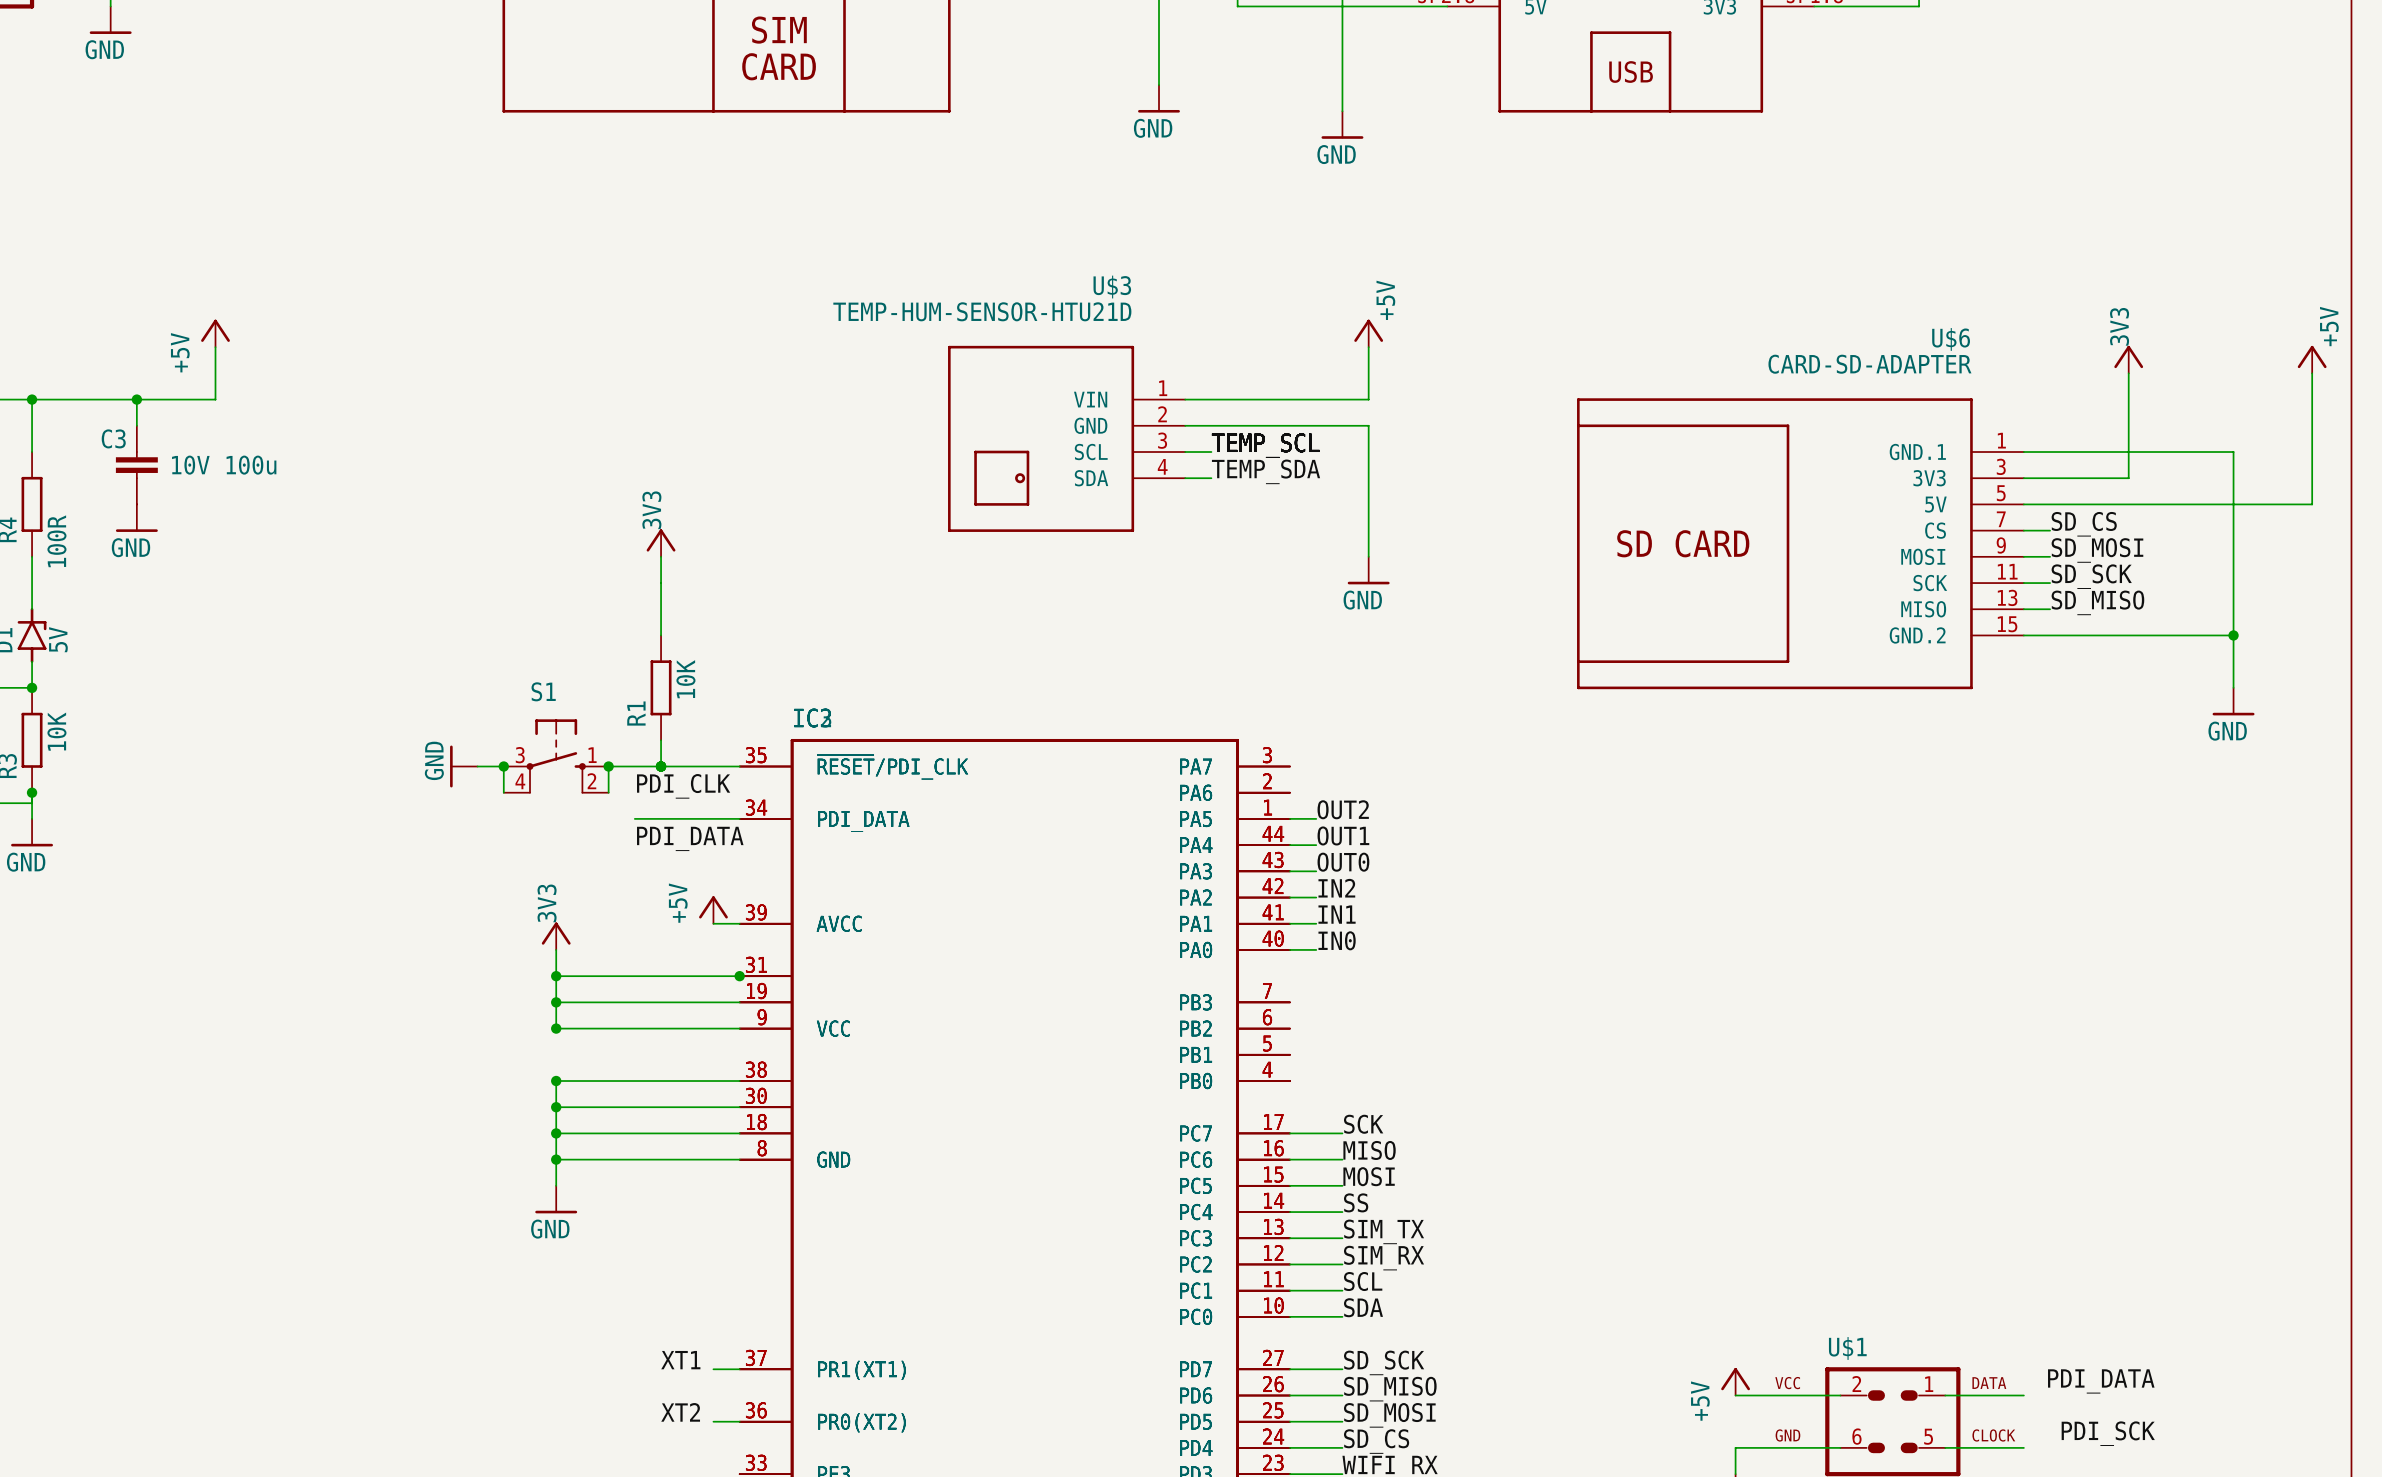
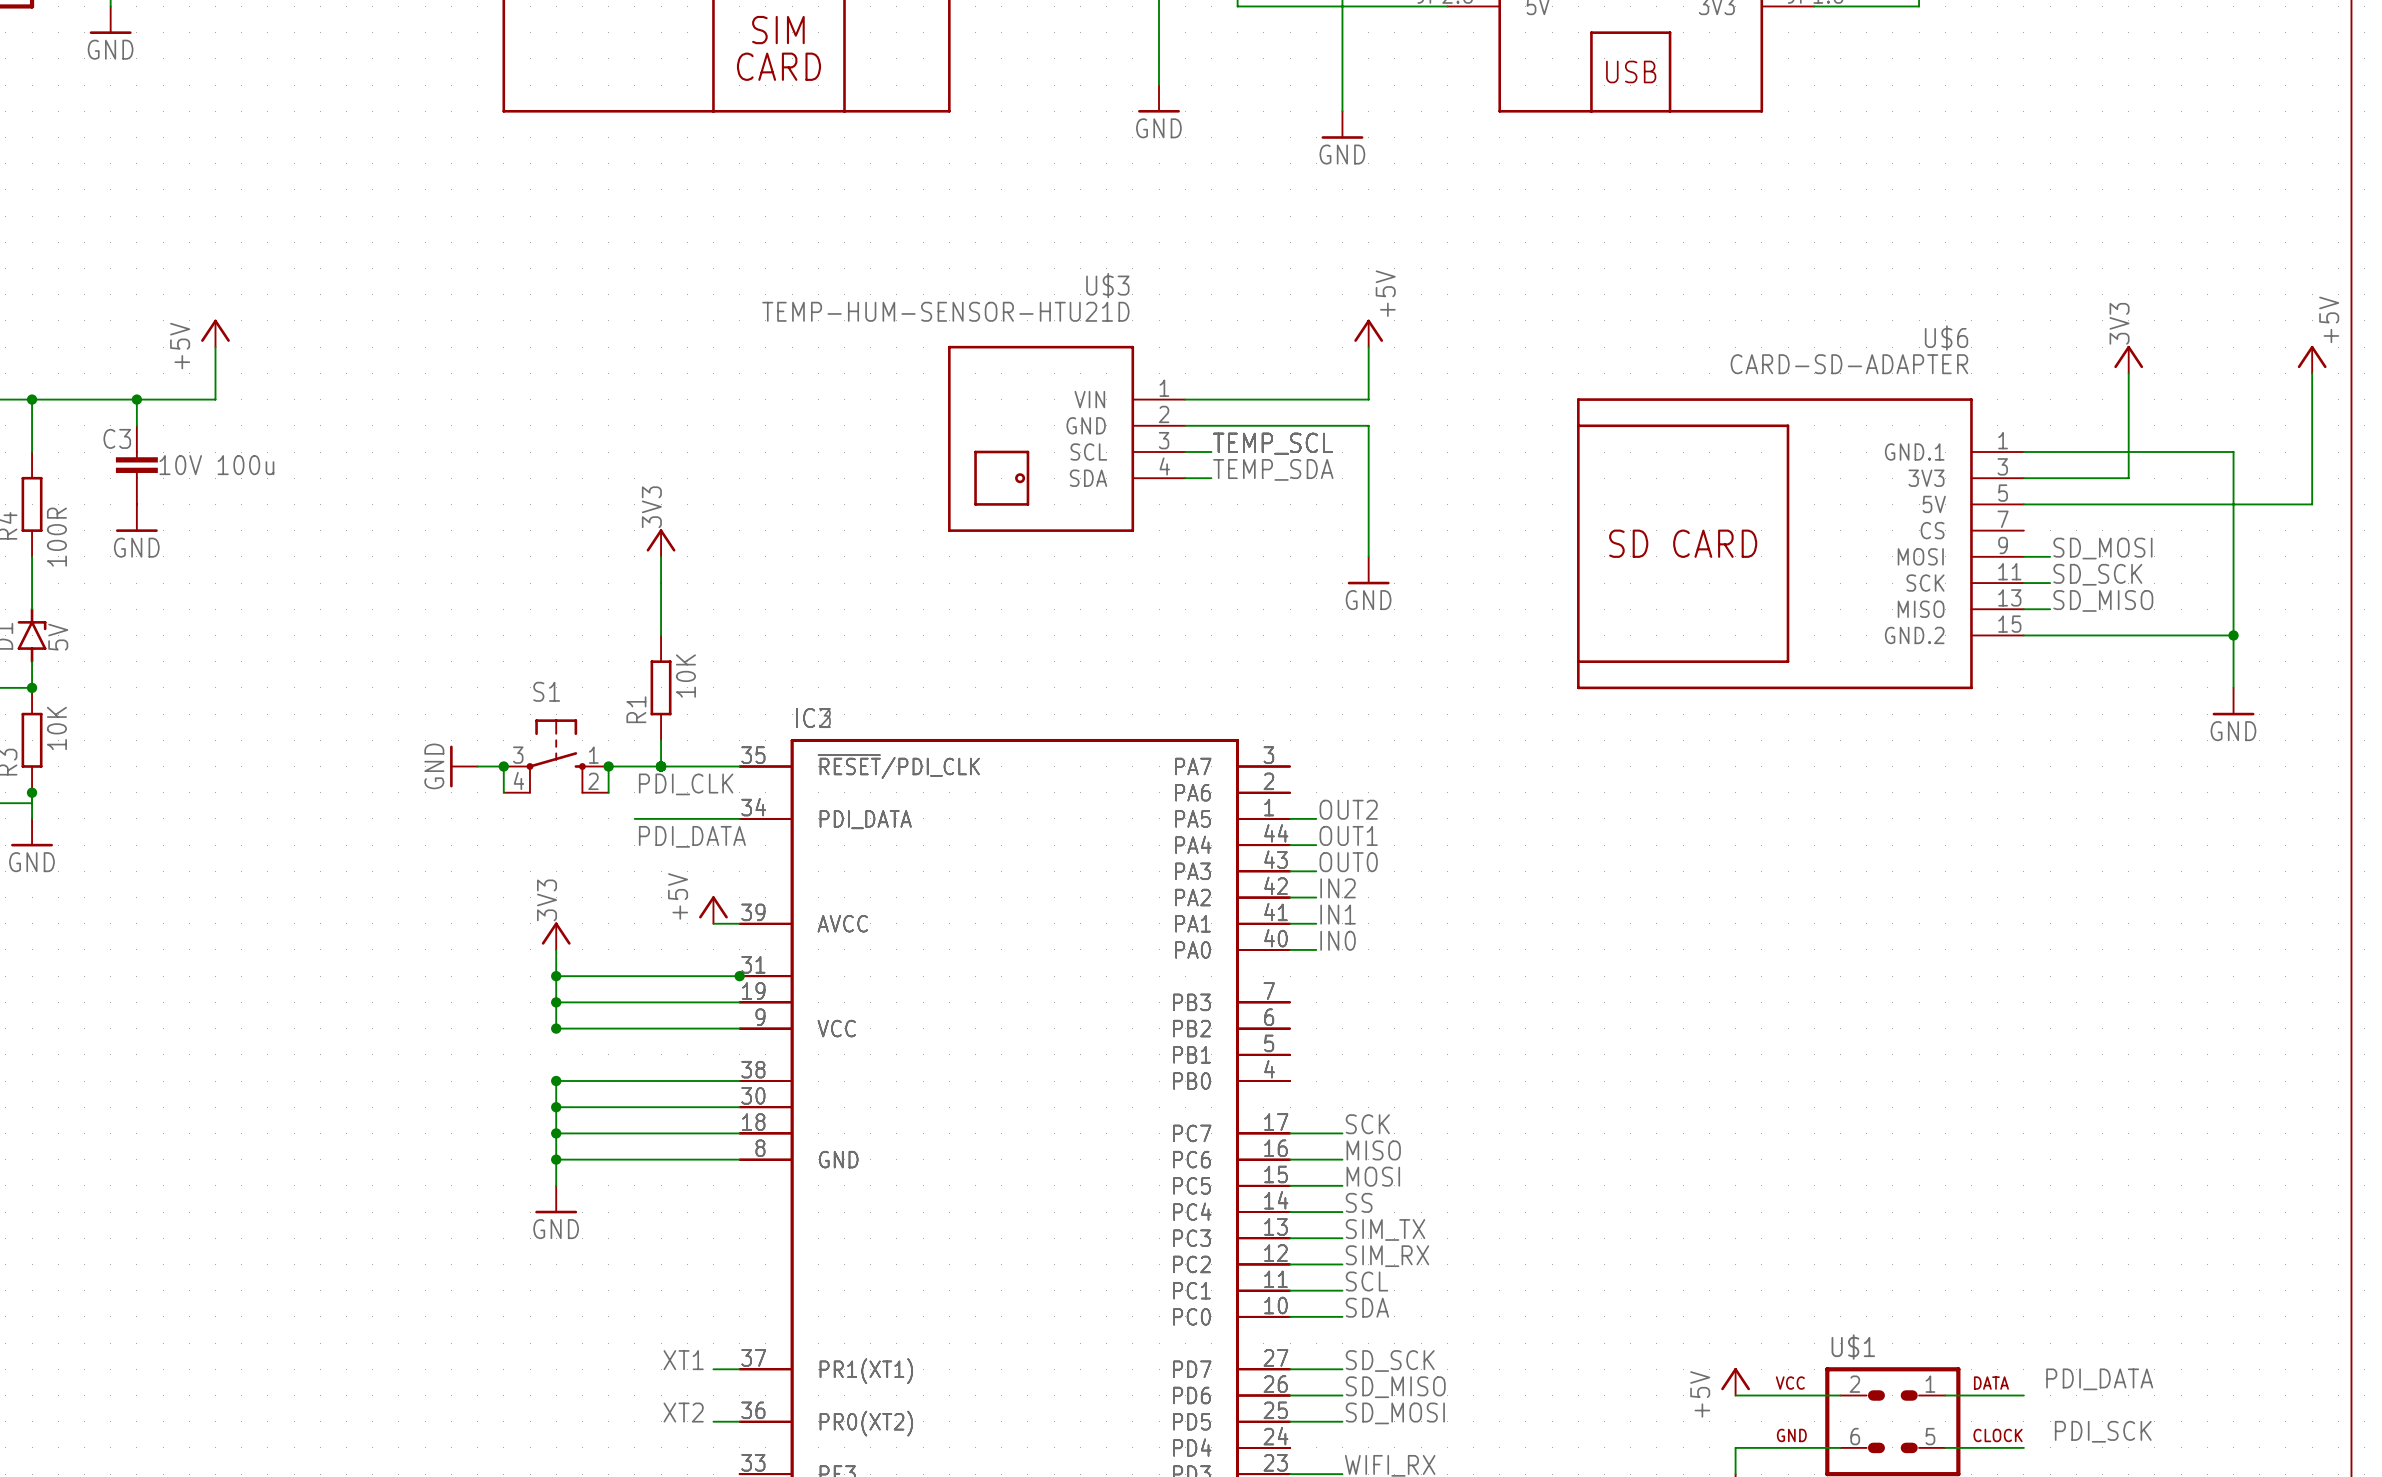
label: SD_CS (2084, 524) -> none
wire: (2023, 530) (2050, 530) -> none
label: SD_CS (1376, 1441) -> none
wire: (1290, 1447) (1342, 1447) -> none

